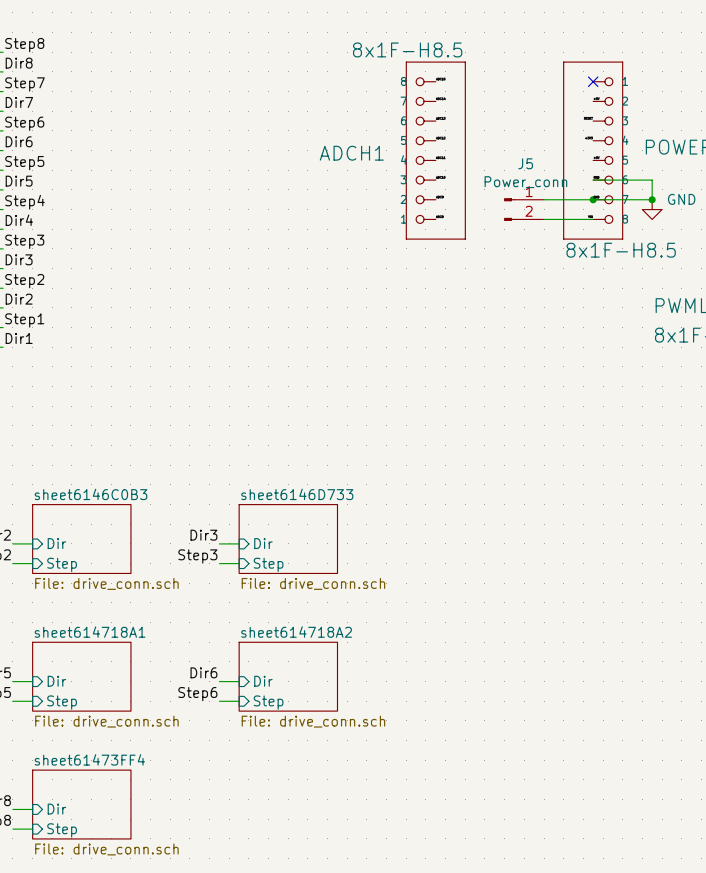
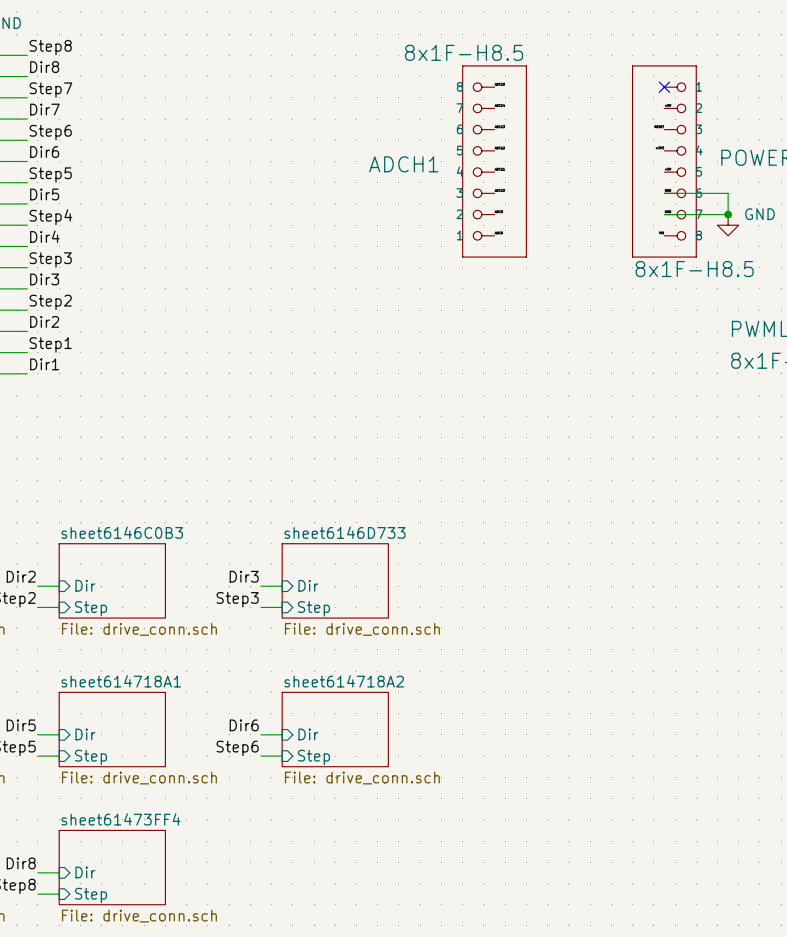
wire: (544, 199) (593, 199) -> none
junction: (593, 199) -> none
J5: Power_conn (524, 209) -> none
wire: (544, 219) (593, 219) -> none

